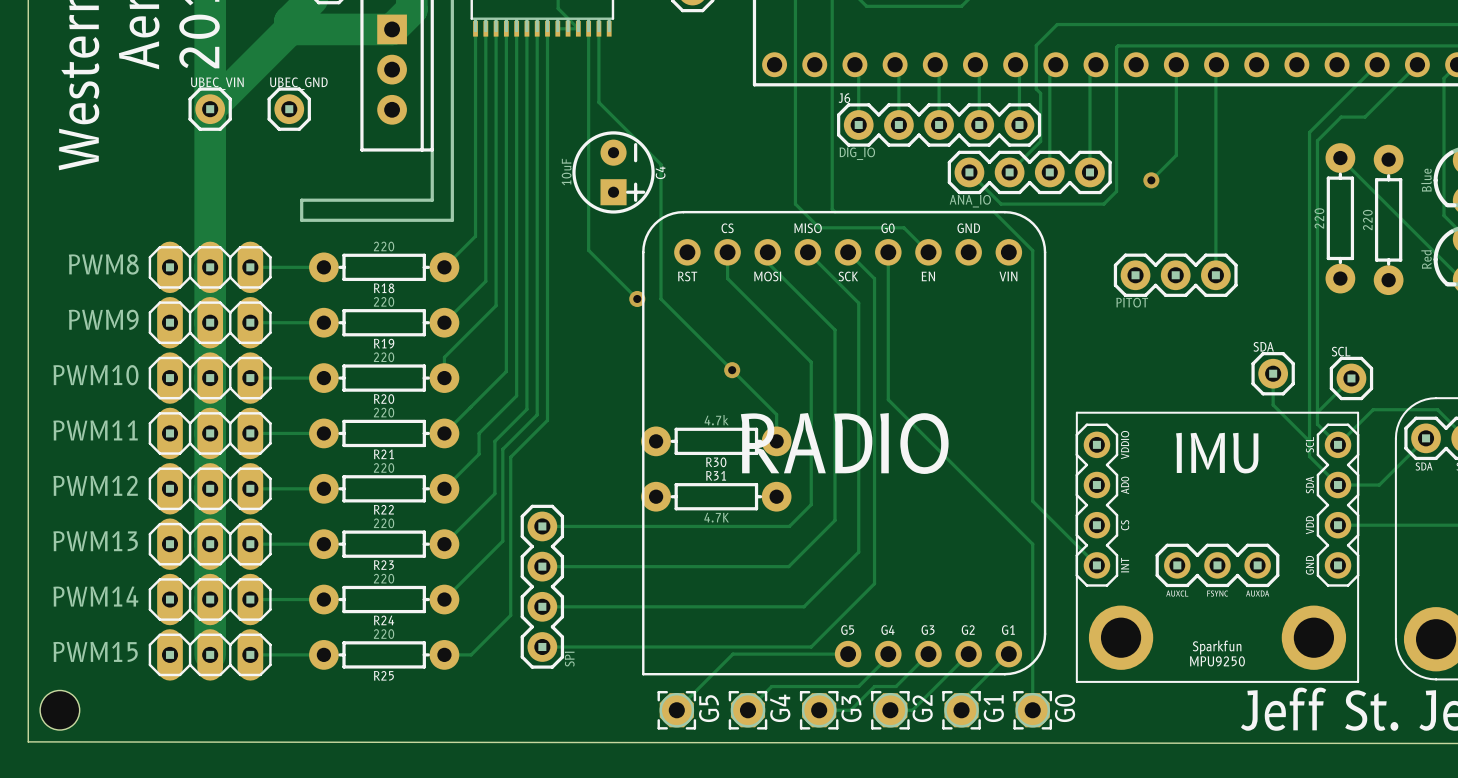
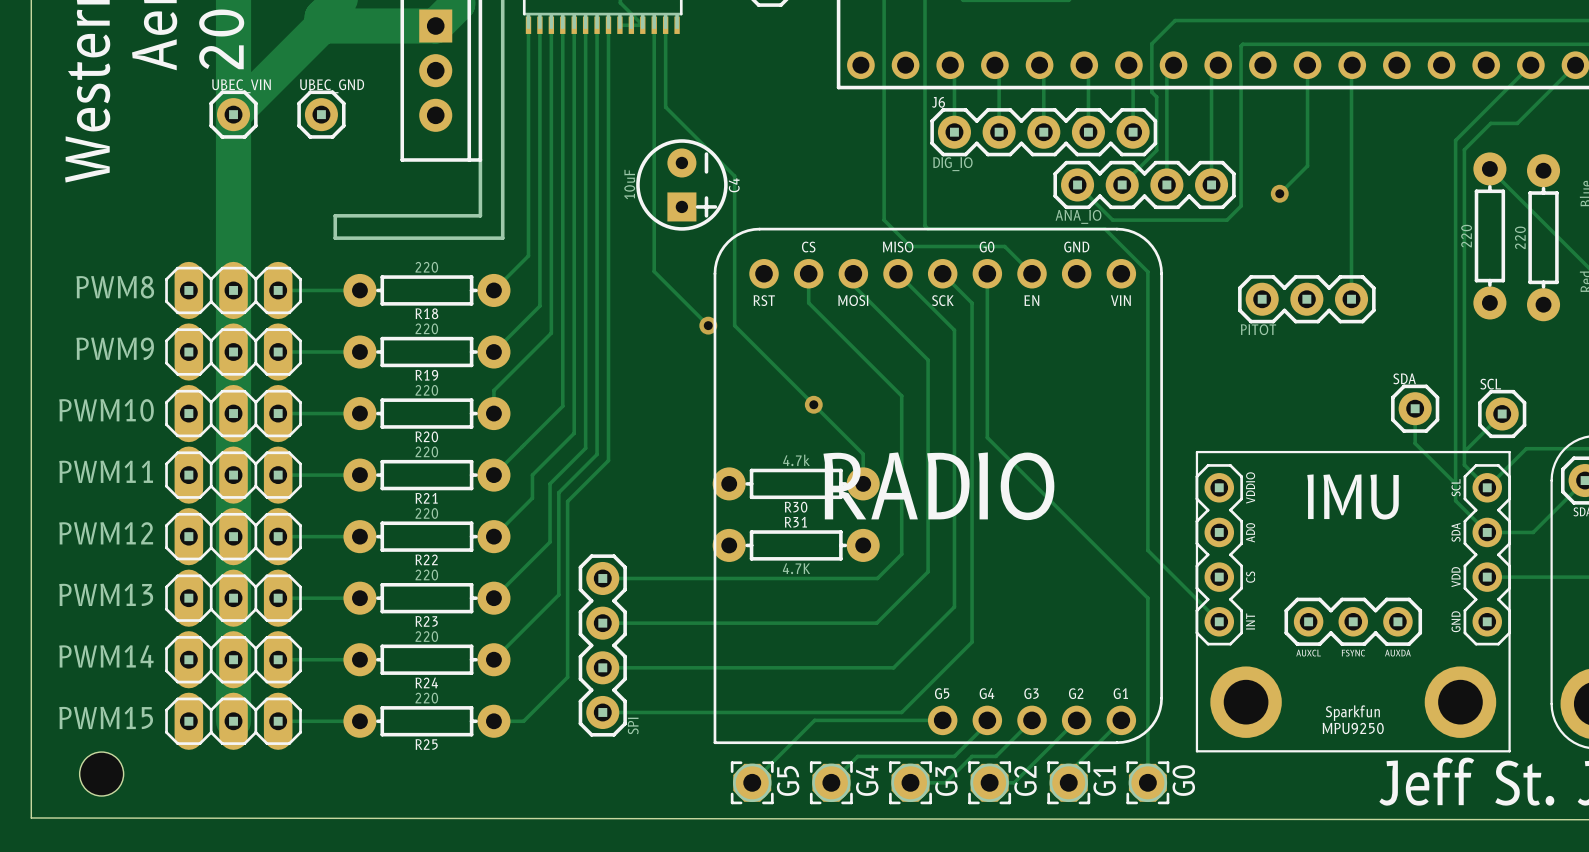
hole position: (59, 710) -> (101, 774)

